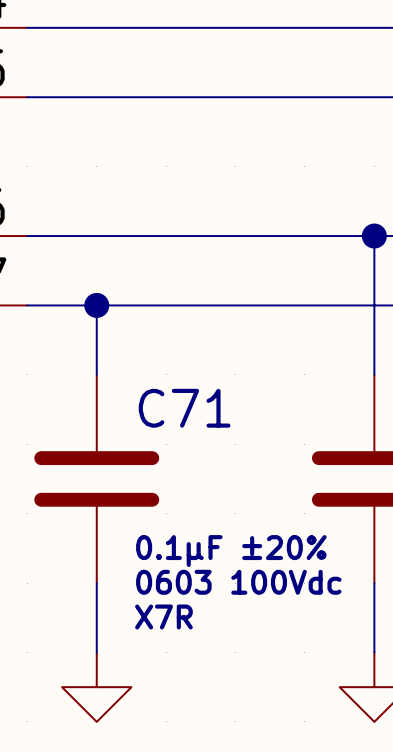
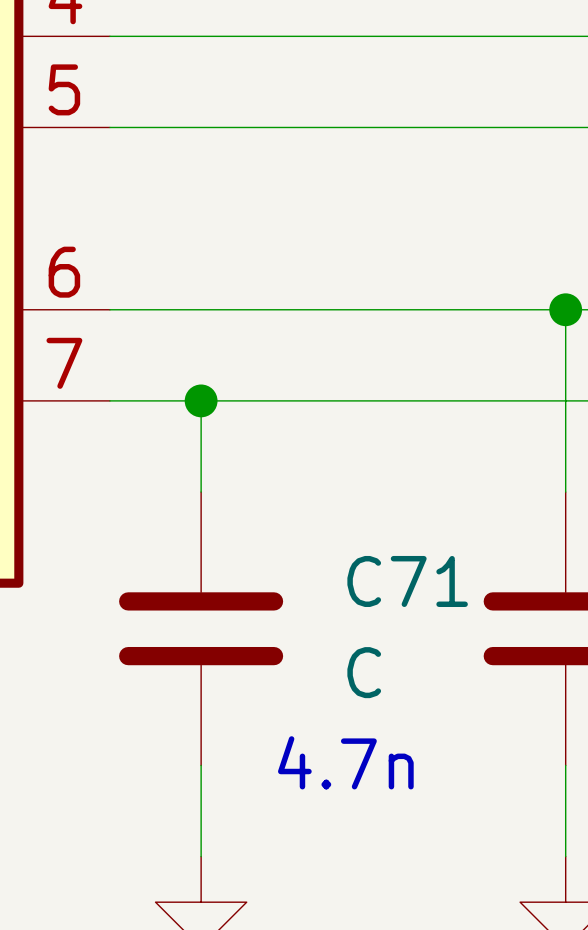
C71 name position: C71 (184, 408) -> C71 (407, 581)
C71 value: none -> C (364, 672)
C71 text: 0.1μF ±20% (231, 551) -> none
text: none -> 4.7n (345, 762)
C71 text: 0603 100Vdc (238, 582) -> none
C71 text: X7R (163, 616) -> none

